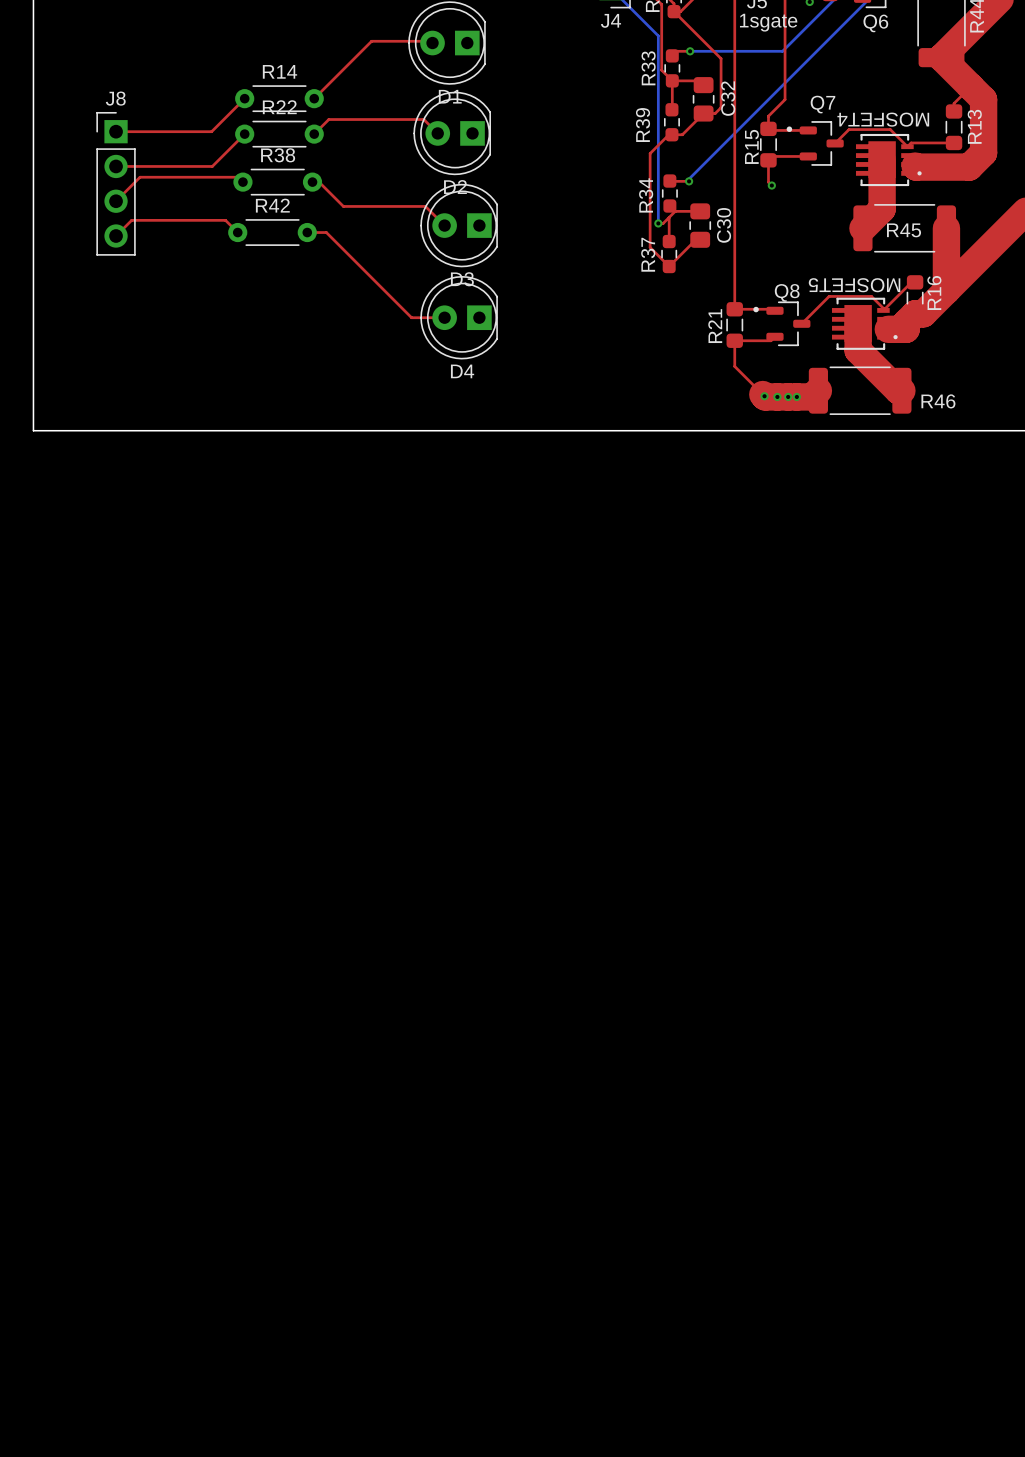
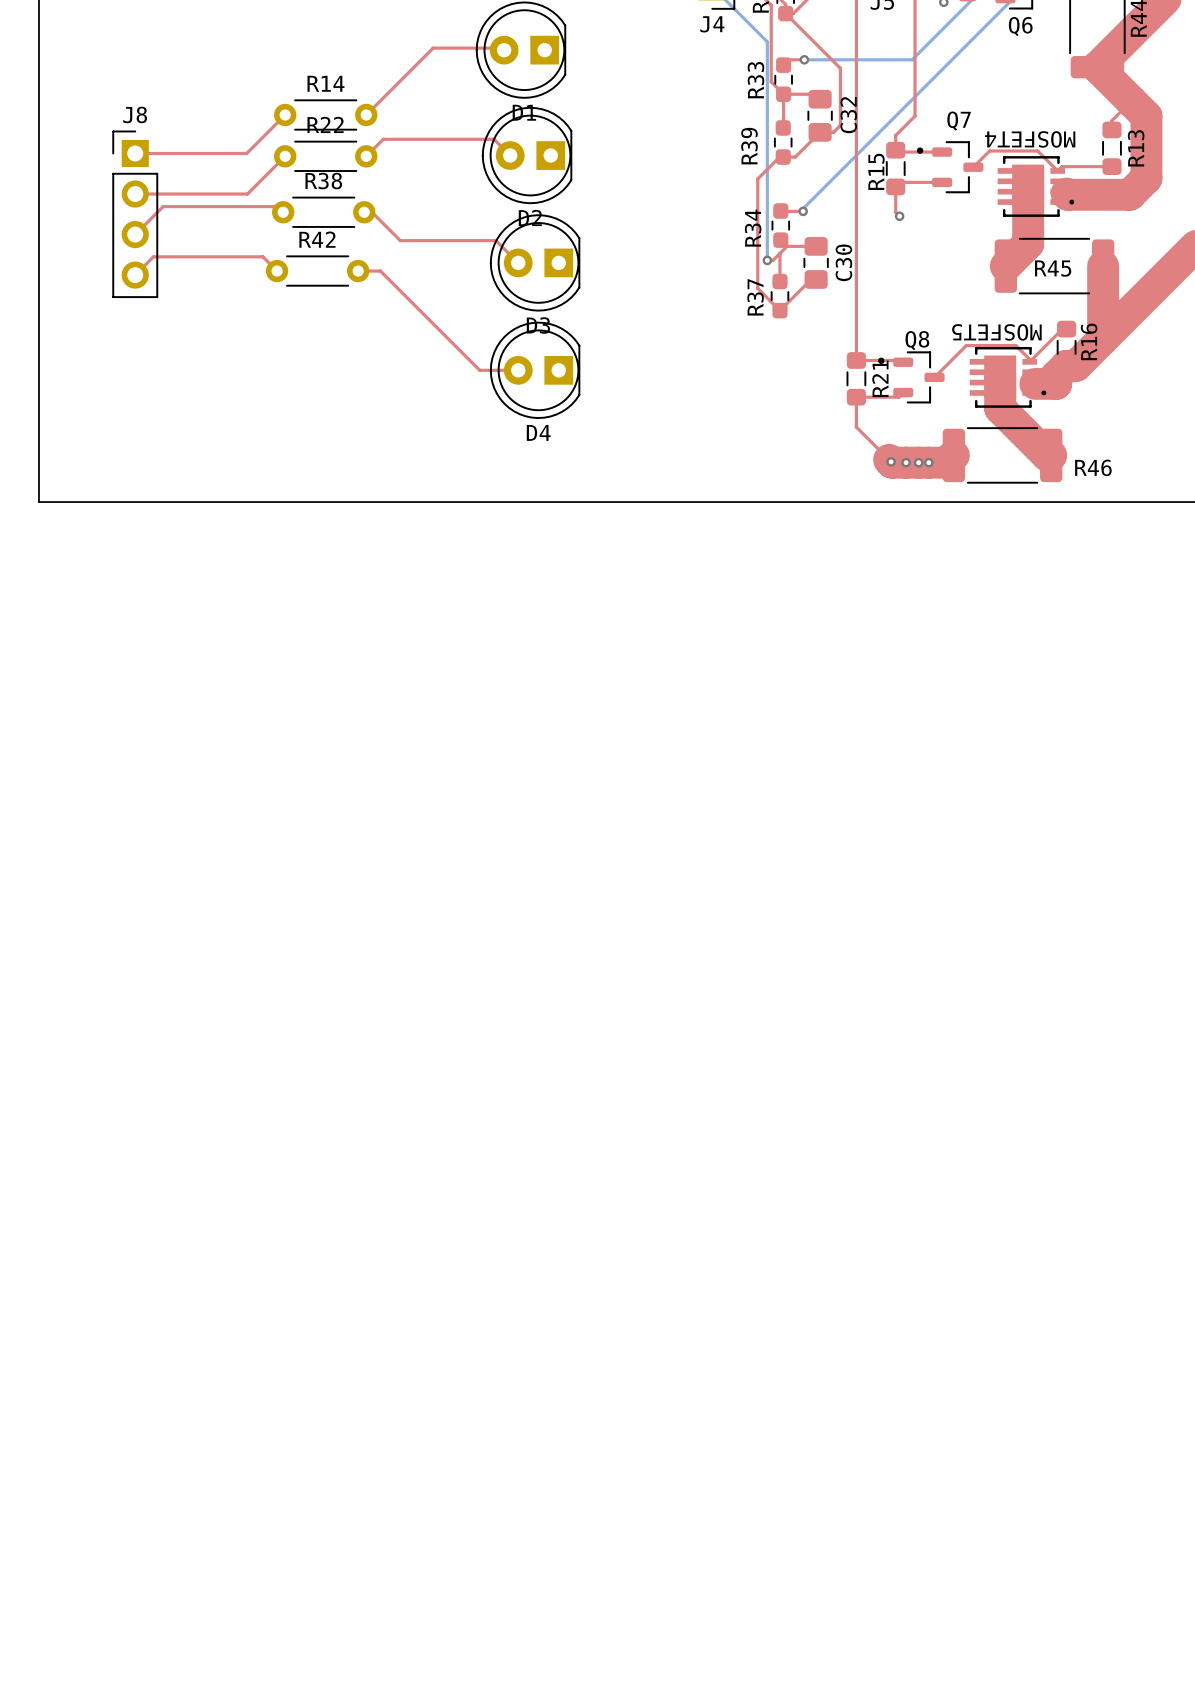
text: 1sgate (768, 22) -> none
R21 name position: R21 (715, 326) -> R21 (880, 378)

